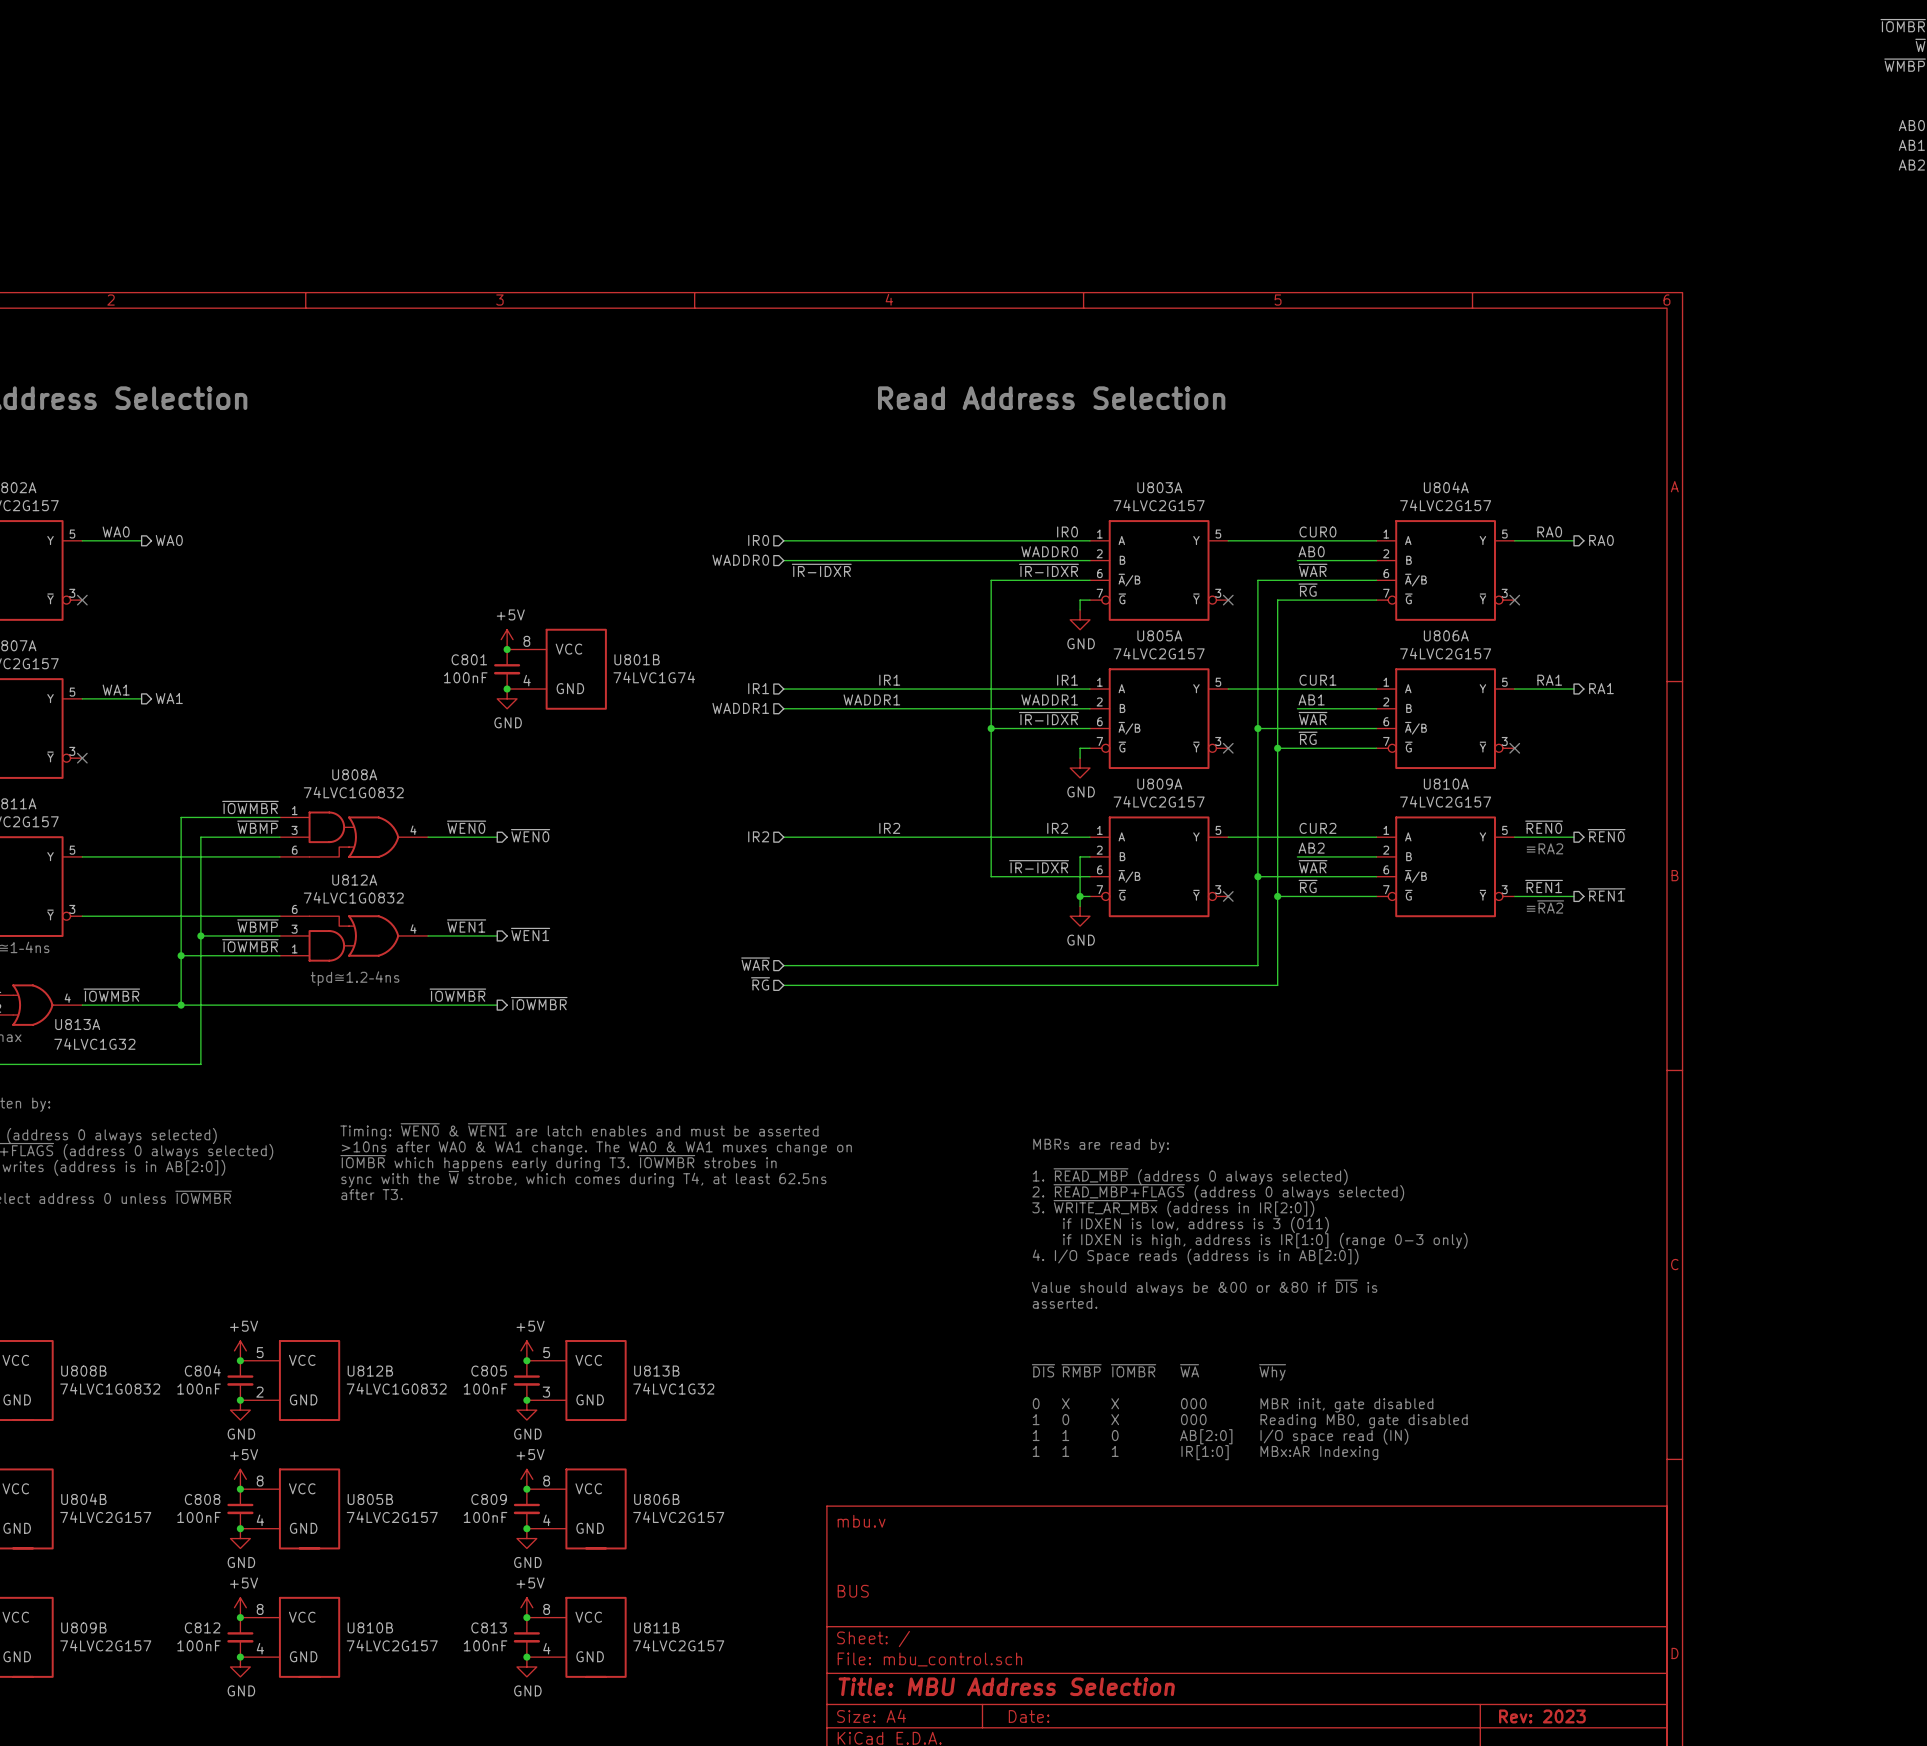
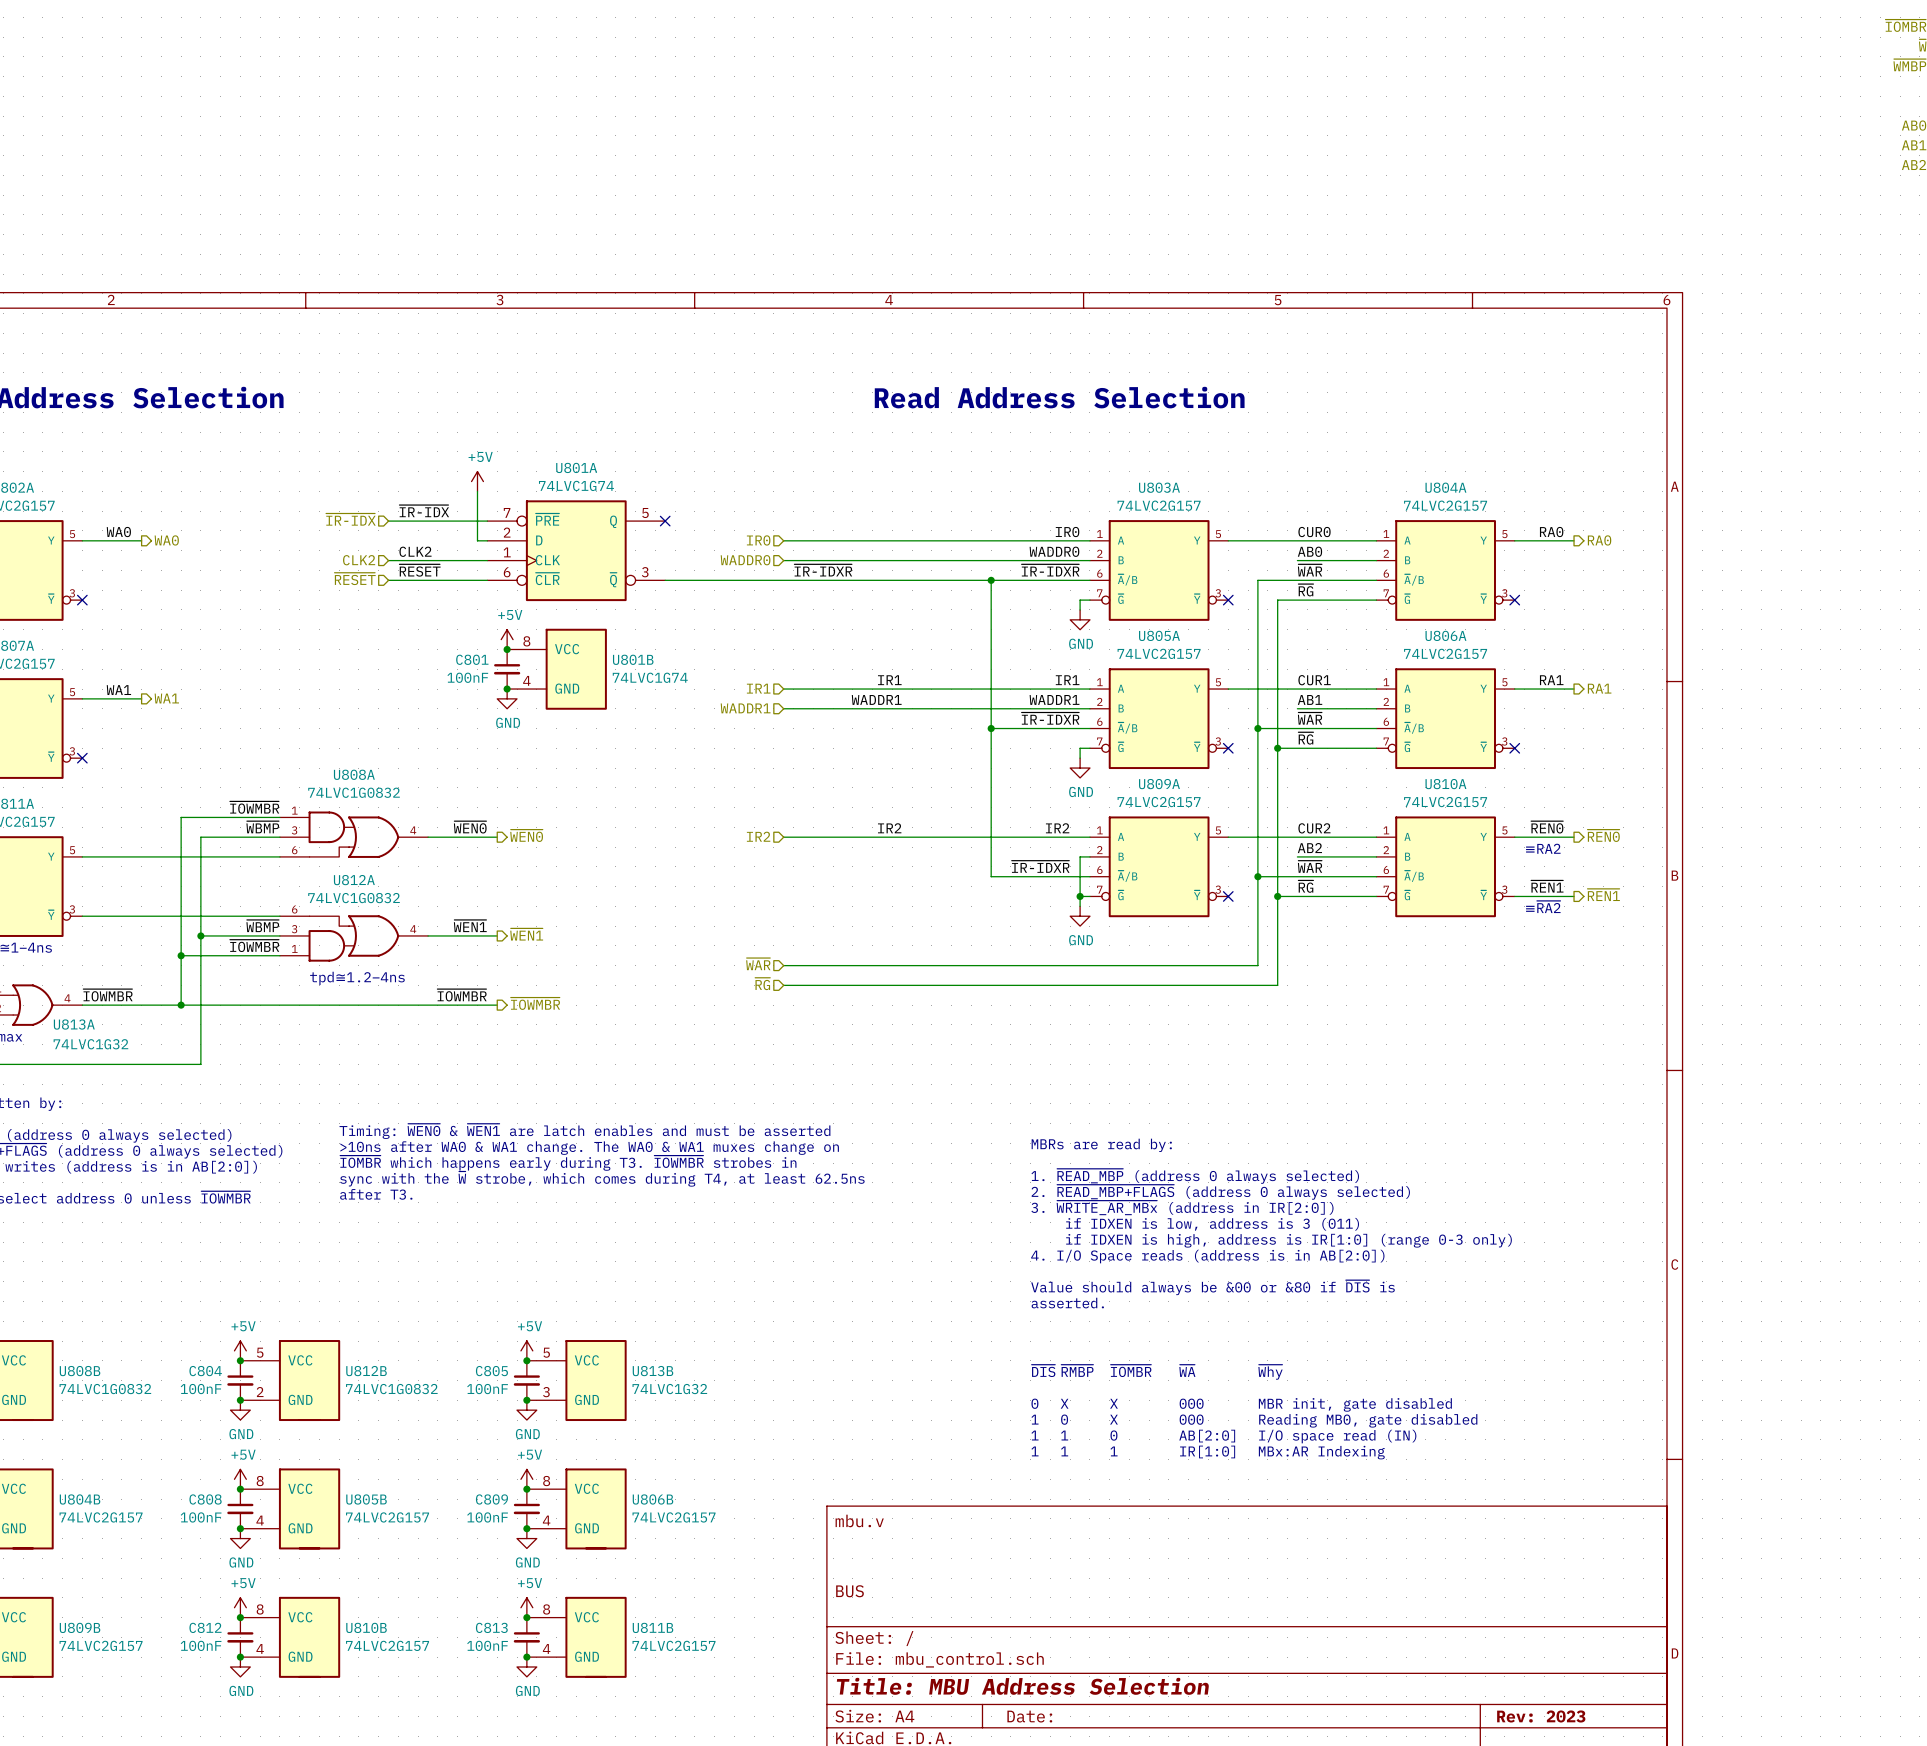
power symbol: none -> +5V (477, 481)
wire: none -> (477, 491) (477, 540) (487, 540)
label: none -> ~{IR-IDX} (424, 511)
hierarchical label: none -> ~{IR-IDX} (350, 519)
wire: none -> (388, 521) (487, 521)
no-connect mark: none -> (665, 521)
U801A: none -> 74LVC1G74 (576, 550)
label: none -> CLK2 (415, 551)
hierarchical label: none -> CLK2 (359, 560)
wire: none -> (388, 560) (487, 560)
label: none -> ~{RESET} (420, 570)
hierarchical label: none -> ~{RESET} (355, 578)
wire: none -> (388, 580) (487, 580)
wire: none -> (665, 580) (991, 580)
junction: none -> (991, 580)

